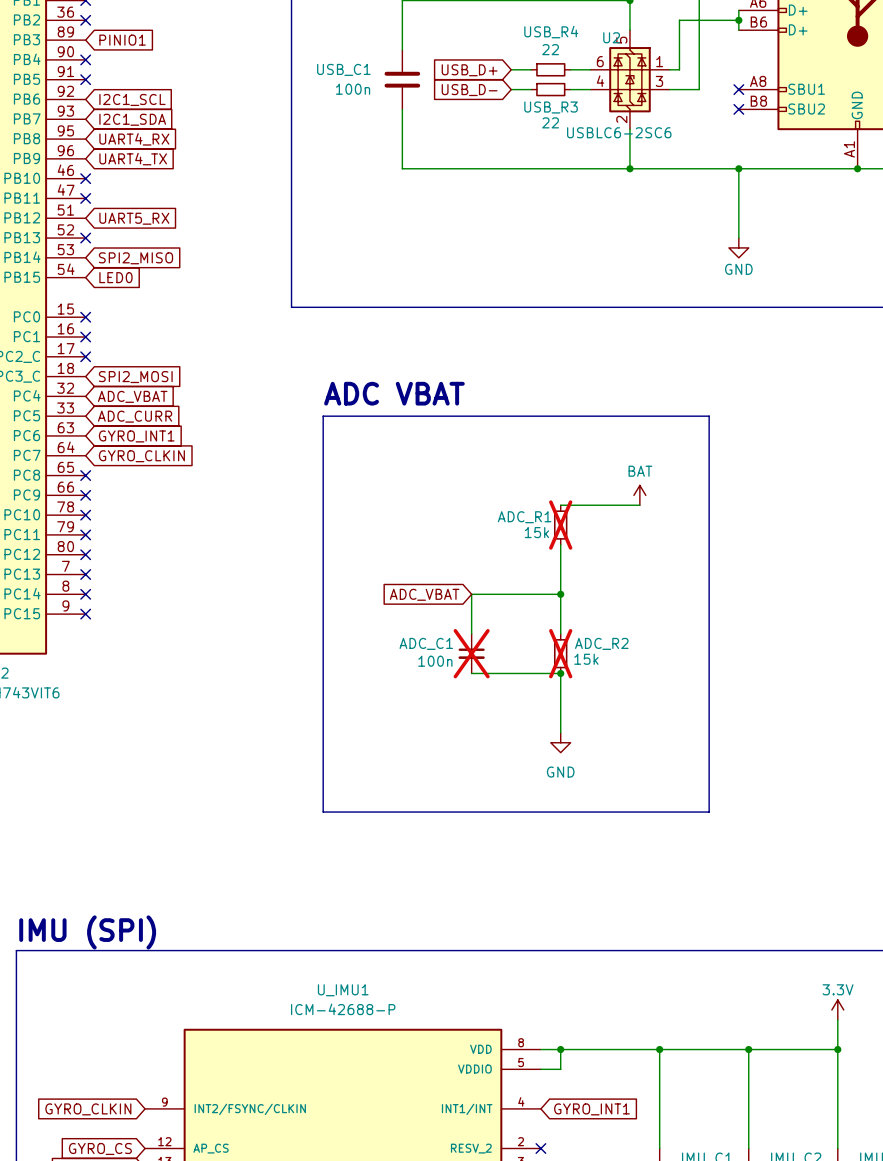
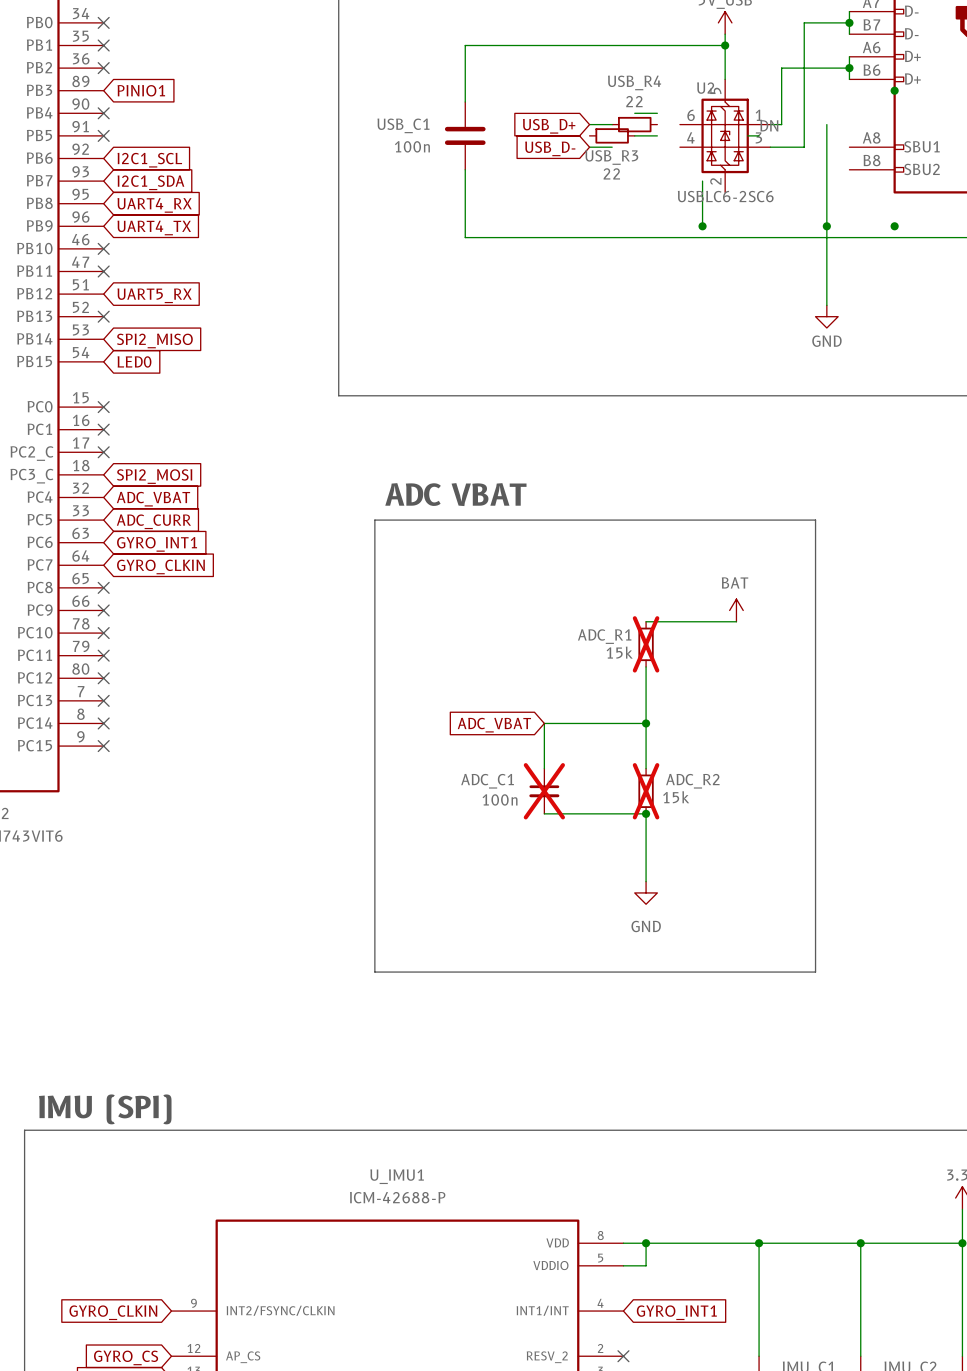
junction: none -> (894, 90)
wire: (570, 69) (590, 69) -> (634, 113) (657, 113)
wire: none -> (826, 124) (826, 305)
label: none -> DN (769, 125)
wire: none -> (747, 135) (759, 135)
USB_R3 position: (550, 89) -> (612, 135)
wire: (570, 89) (590, 89) -> (634, 135) (657, 135)
no-connect mark: (738, 89) -> none
no-connect mark: (738, 109) -> none
wire: (629, 129) (629, 168) -> (702, 181) (702, 226)
junction: none -> (826, 226)
junction: none -> (894, 226)
junction position: (629, 168) -> (702, 226)
wire: (738, 168) (738, 238) -> none
junction: (738, 168) -> none
power symbol position: GND (738, 247) -> GND (826, 316)

